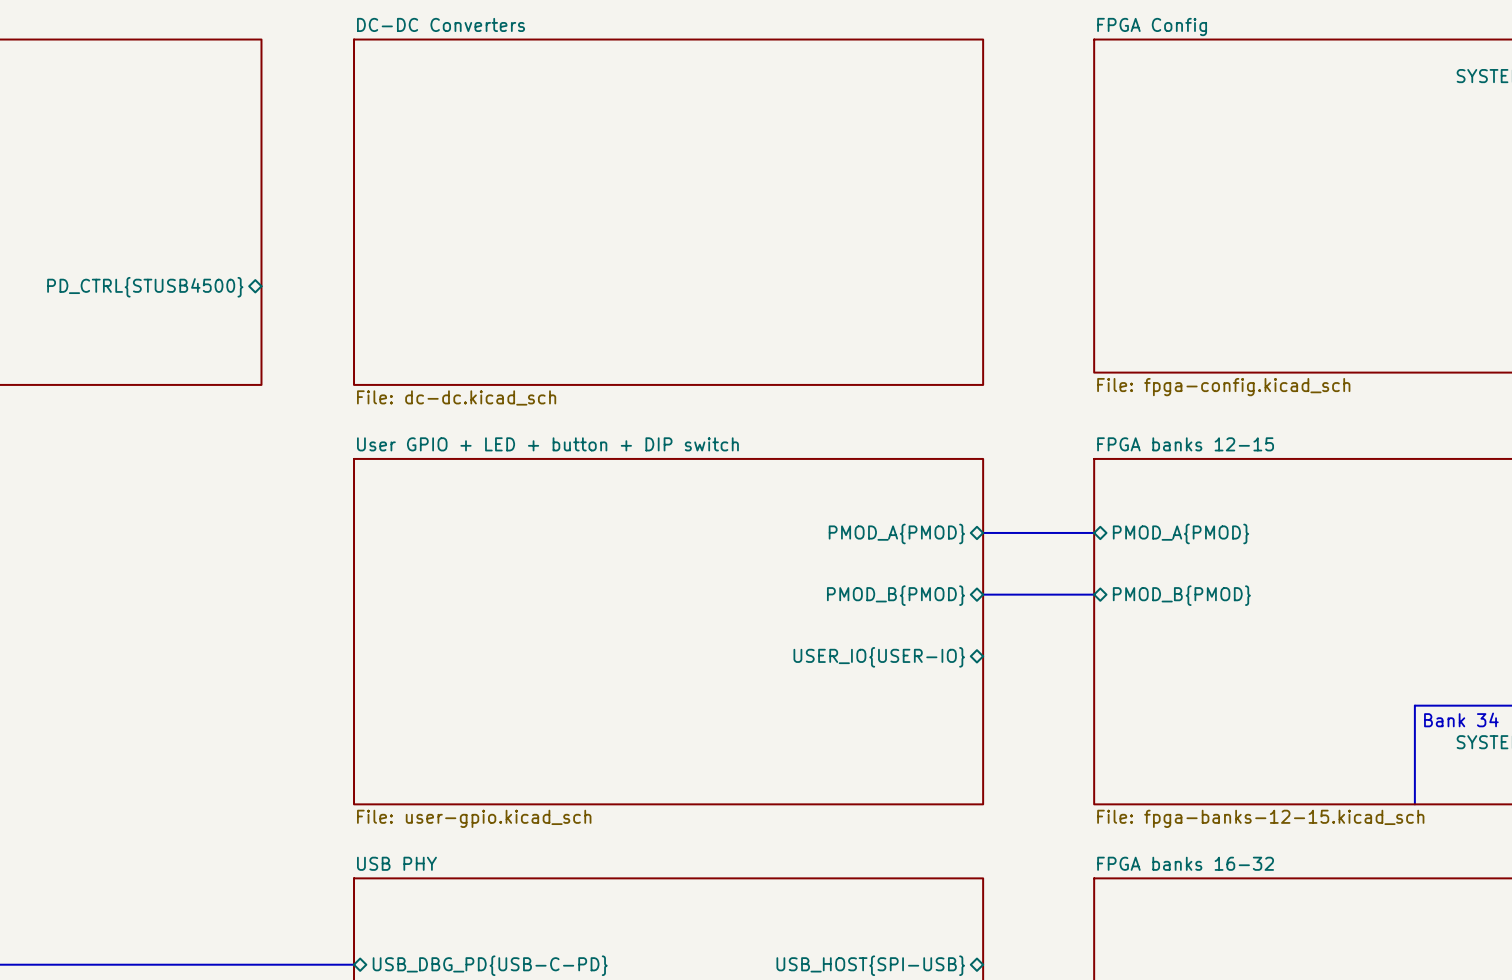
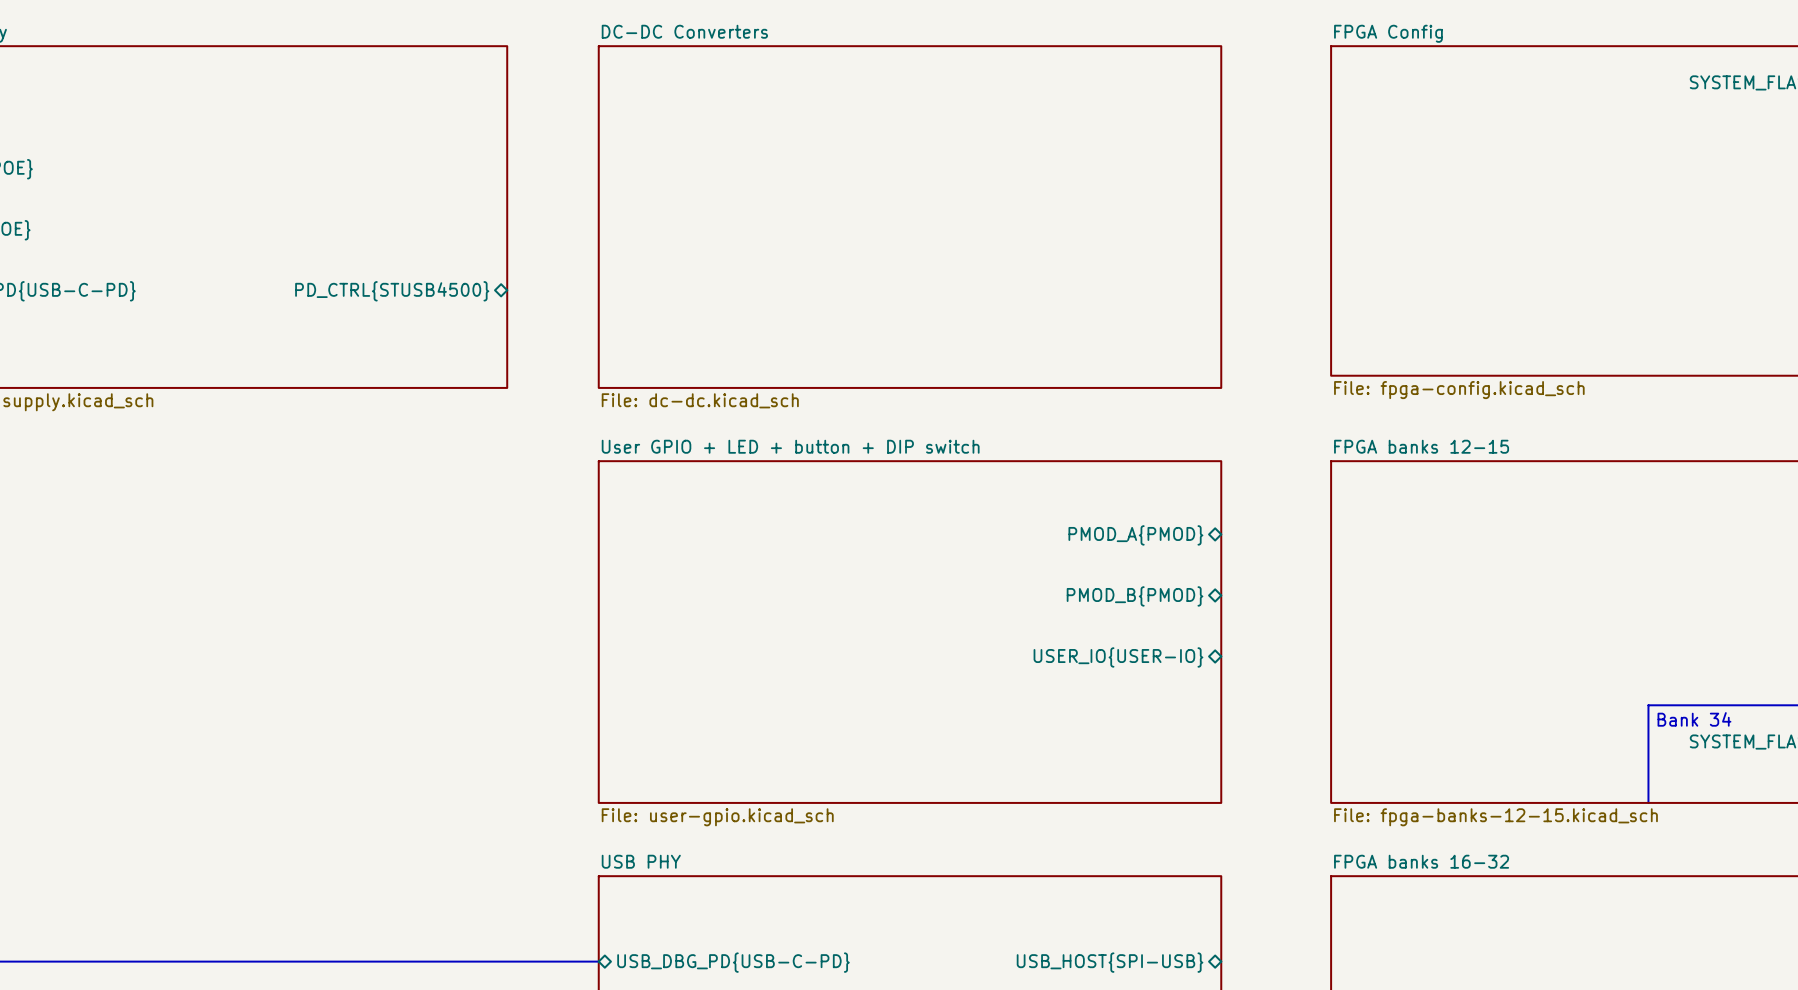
bus: (983, 532) (1094, 532) -> none
sheet pin: PMOD_A{PMOD} (1180, 533) -> none
bus: (983, 594) (1094, 594) -> none
sheet pin: PMOD_B{PMOD} (1181, 595) -> none

